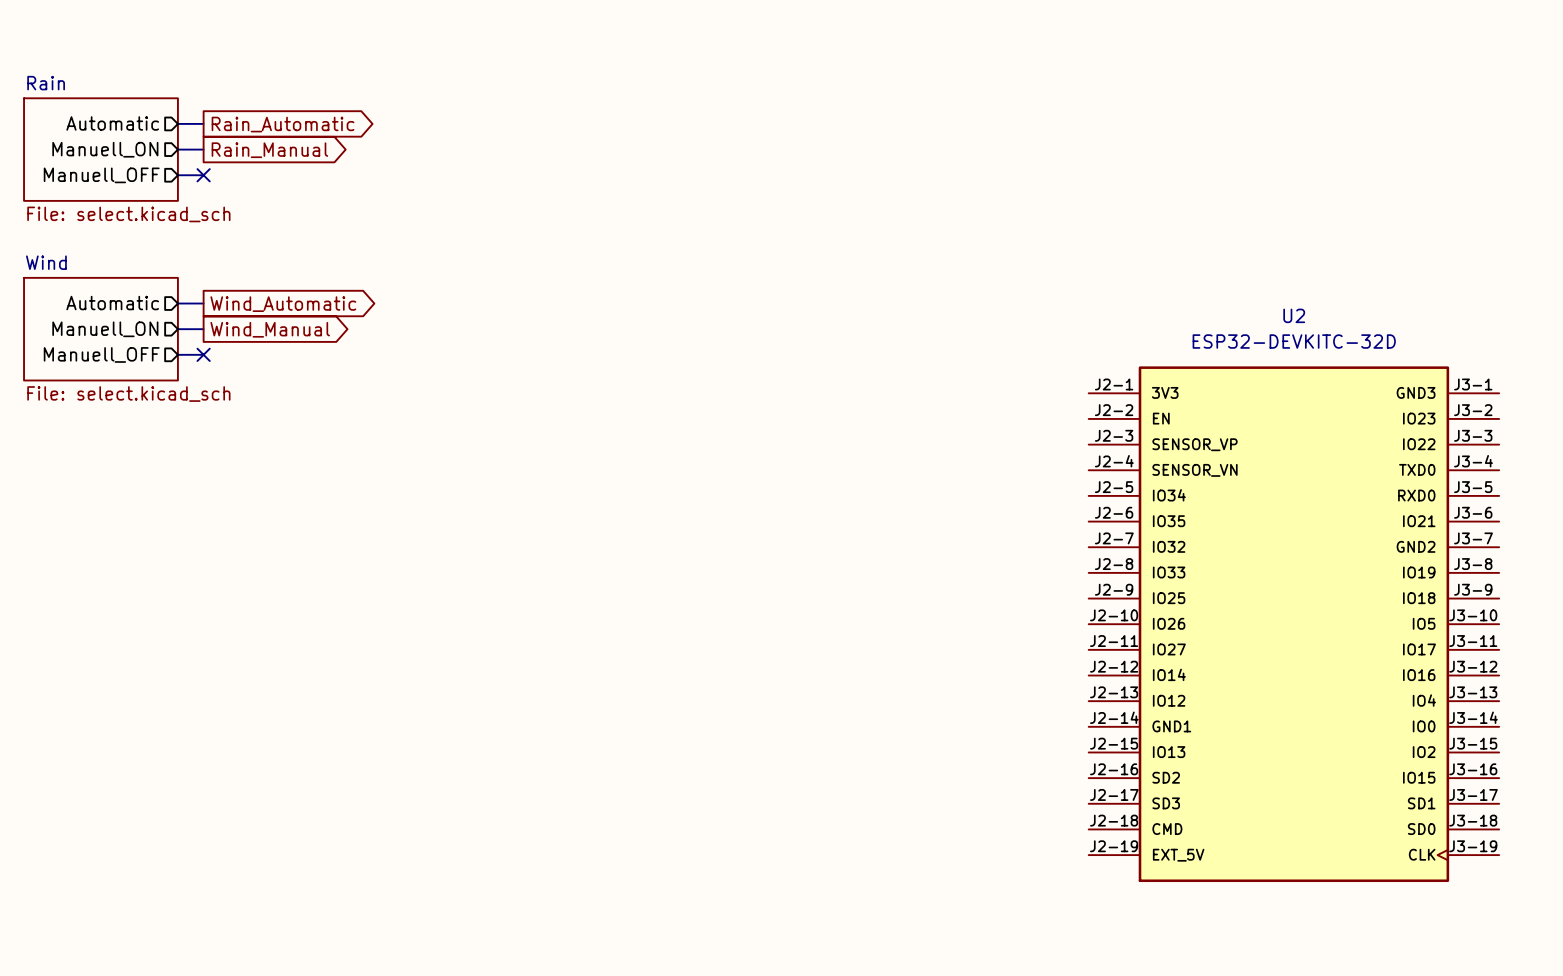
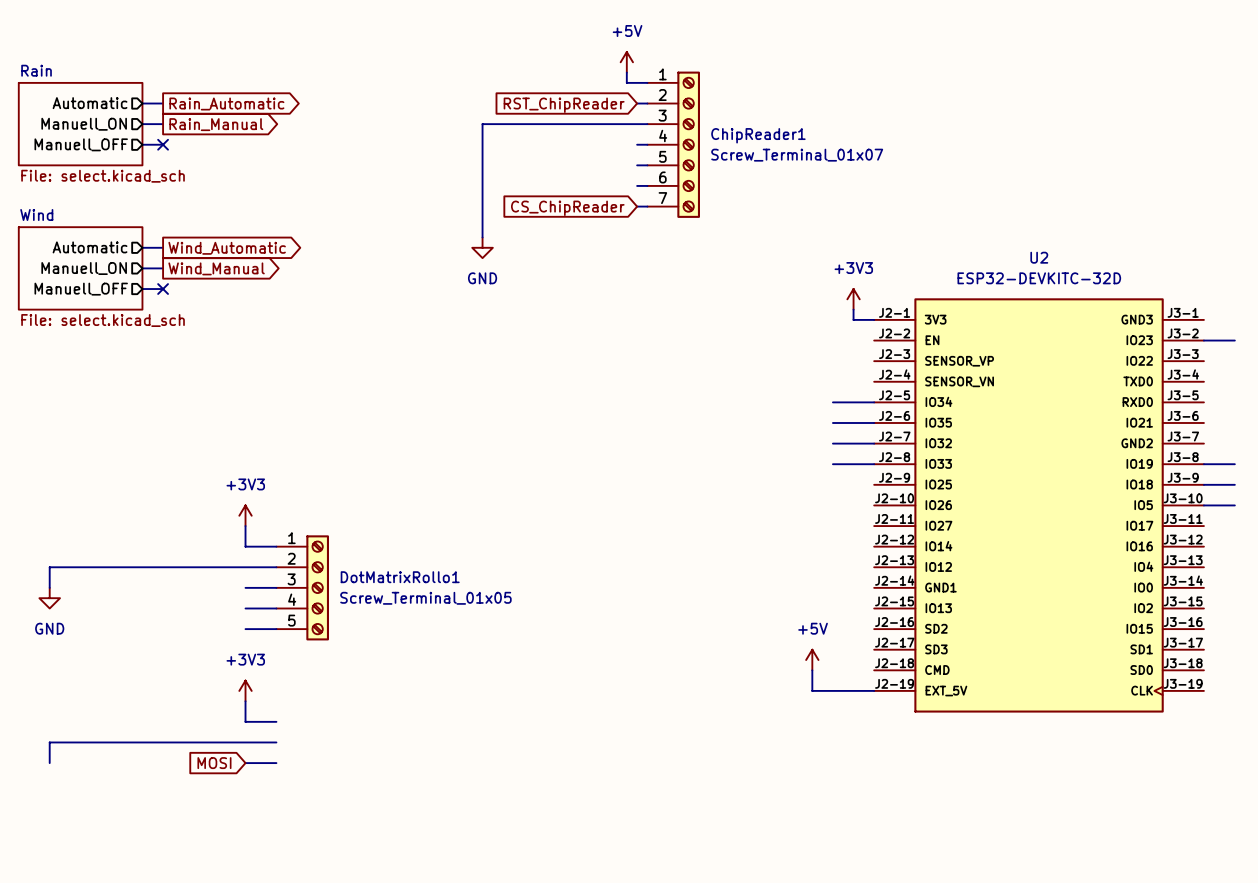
power symbol: none -> +5V (626, 62)
wire: none -> (626, 72) (626, 82) (647, 82)
wire: none -> (637, 103) (647, 103)
global label: none -> RST_ChipReader (564, 105)
wire: none -> (647, 124) (482, 124) (482, 237)
wire: none -> (637, 144) (647, 144)
ChipReader1: none -> Screw_Terminal_01x07 (673, 144)
wire: none -> (637, 165) (647, 165)
wire: none -> (637, 185) (647, 185)
wire: none -> (637, 206) (647, 206)
global label: none -> CS_ChipReader (567, 208)
power symbol: none -> GND (482, 247)
power symbol: none -> +3V3 (853, 299)
wire: none -> (853, 309) (853, 319) (874, 319)
wire: none -> (1203, 340) (1234, 340)
wire: none -> (832, 402) (874, 402)
wire: none -> (832, 422) (874, 422)
wire: none -> (832, 443) (874, 443)
wire: none -> (832, 464) (874, 464)
wire: none -> (1203, 464) (1234, 464)
wire: none -> (1203, 484) (1234, 484)
wire: none -> (1203, 505) (1234, 505)
power symbol: none -> +3V3 (245, 515)
wire: none -> (245, 526) (245, 546) (276, 546)
wire: none -> (276, 567) (49, 567) (49, 587)
wire: none -> (245, 587) (276, 587)
DotMatrixRollo1: none -> Screw_Terminal_01x05 (302, 587)
power symbol: none -> GND (49, 598)
wire: none -> (245, 608) (276, 608)
wire: none -> (245, 629) (276, 629)
power symbol: none -> +5V (812, 660)
wire: none -> (812, 670) (812, 690) (874, 690)
power symbol: none -> +3V3 (245, 690)
wire: none -> (245, 701) (245, 721) (276, 721)
wire: none -> (276, 742) (49, 742) (49, 763)
global label: none -> MOSI (214, 763)
wire: none -> (245, 763) (276, 763)

